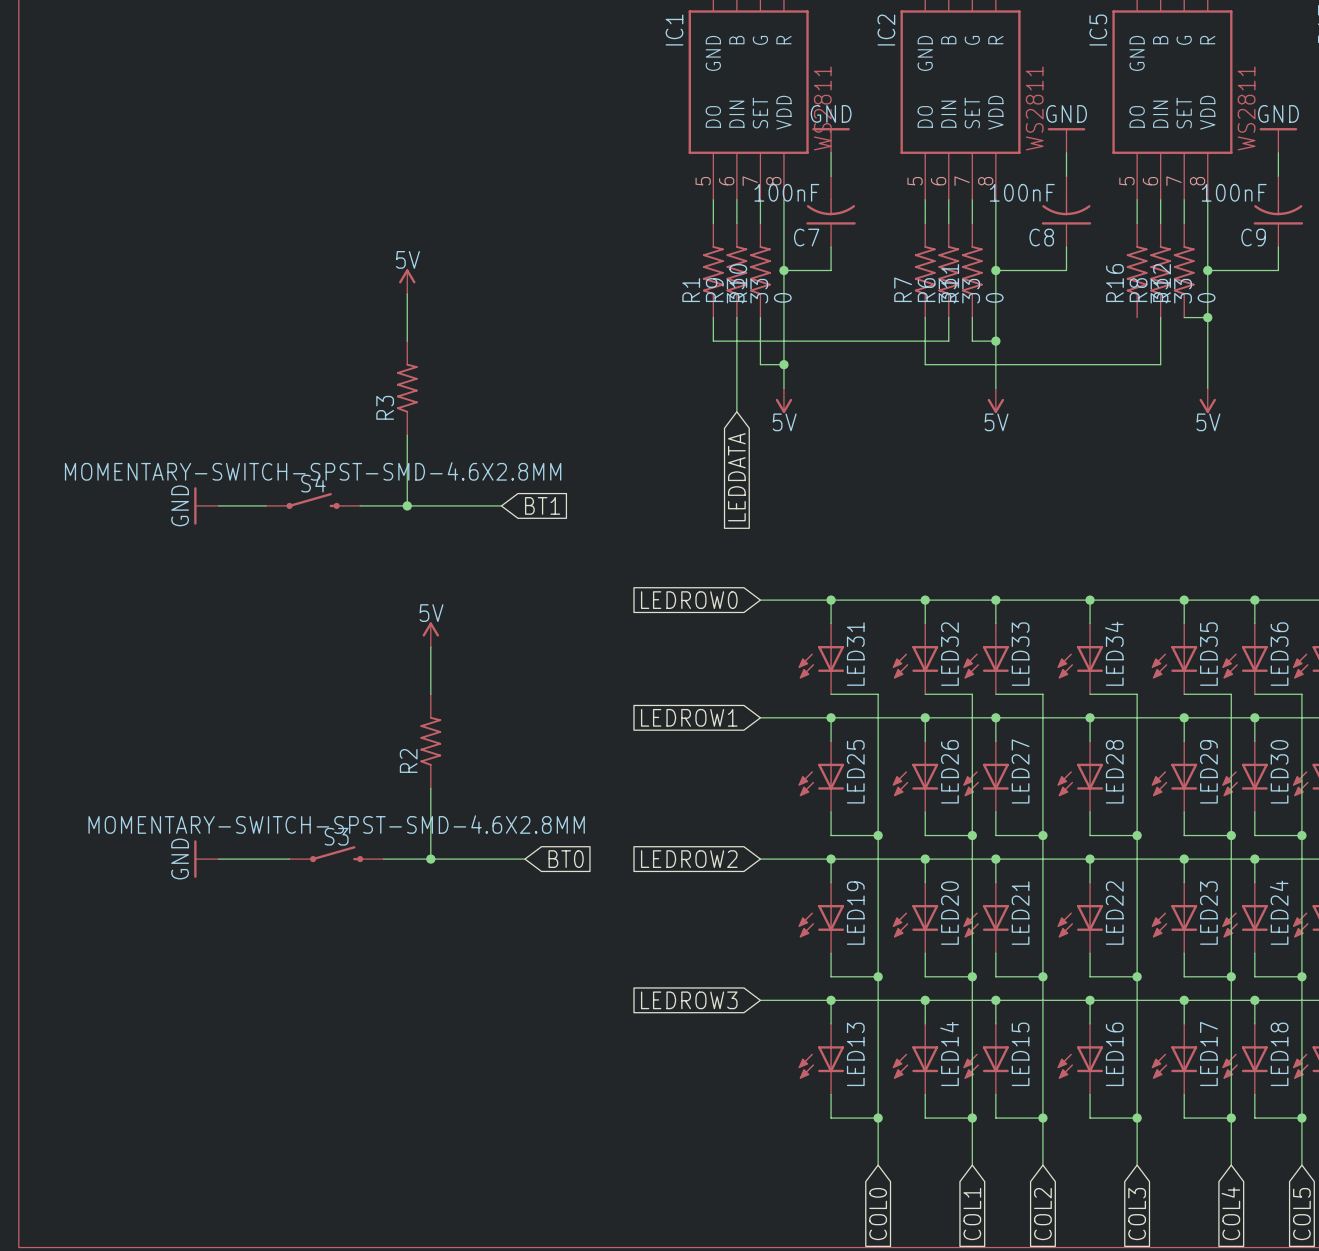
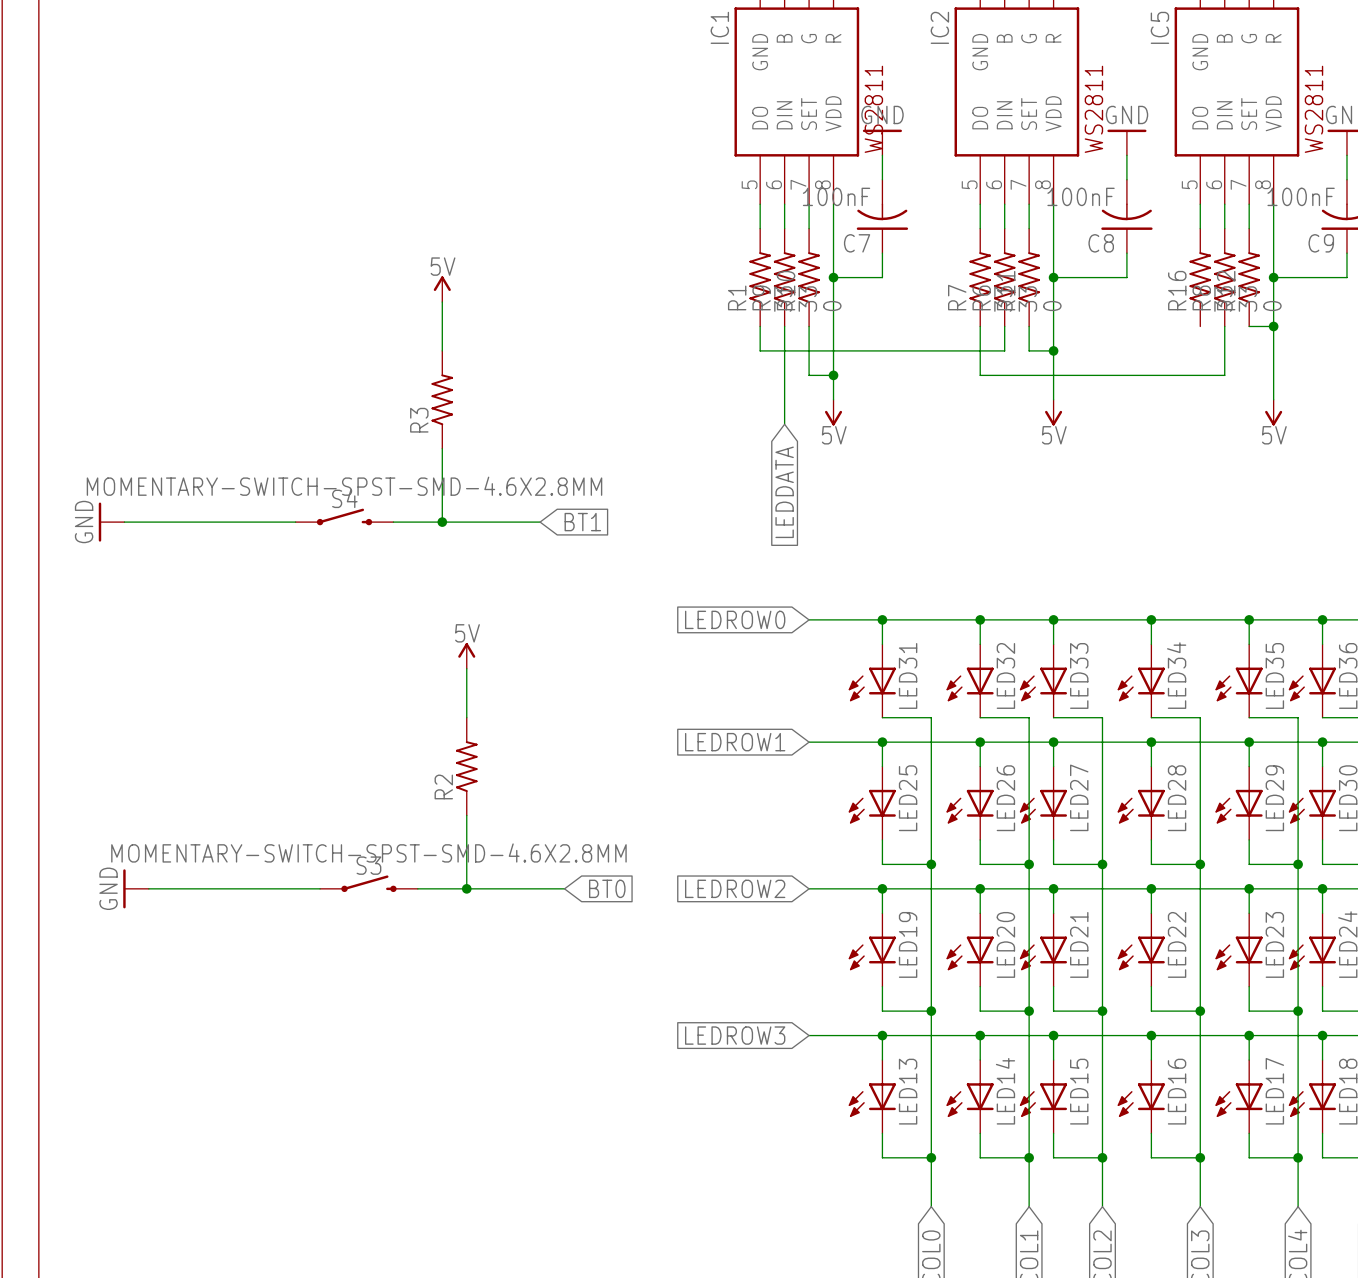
wire: none -> (124, 522) (246, 522)
power symbol position: GND (206, 505) -> GND (111, 522)
wire: none -> (148, 888) (246, 888)
power symbol position: GND (206, 859) -> GND (136, 888)

